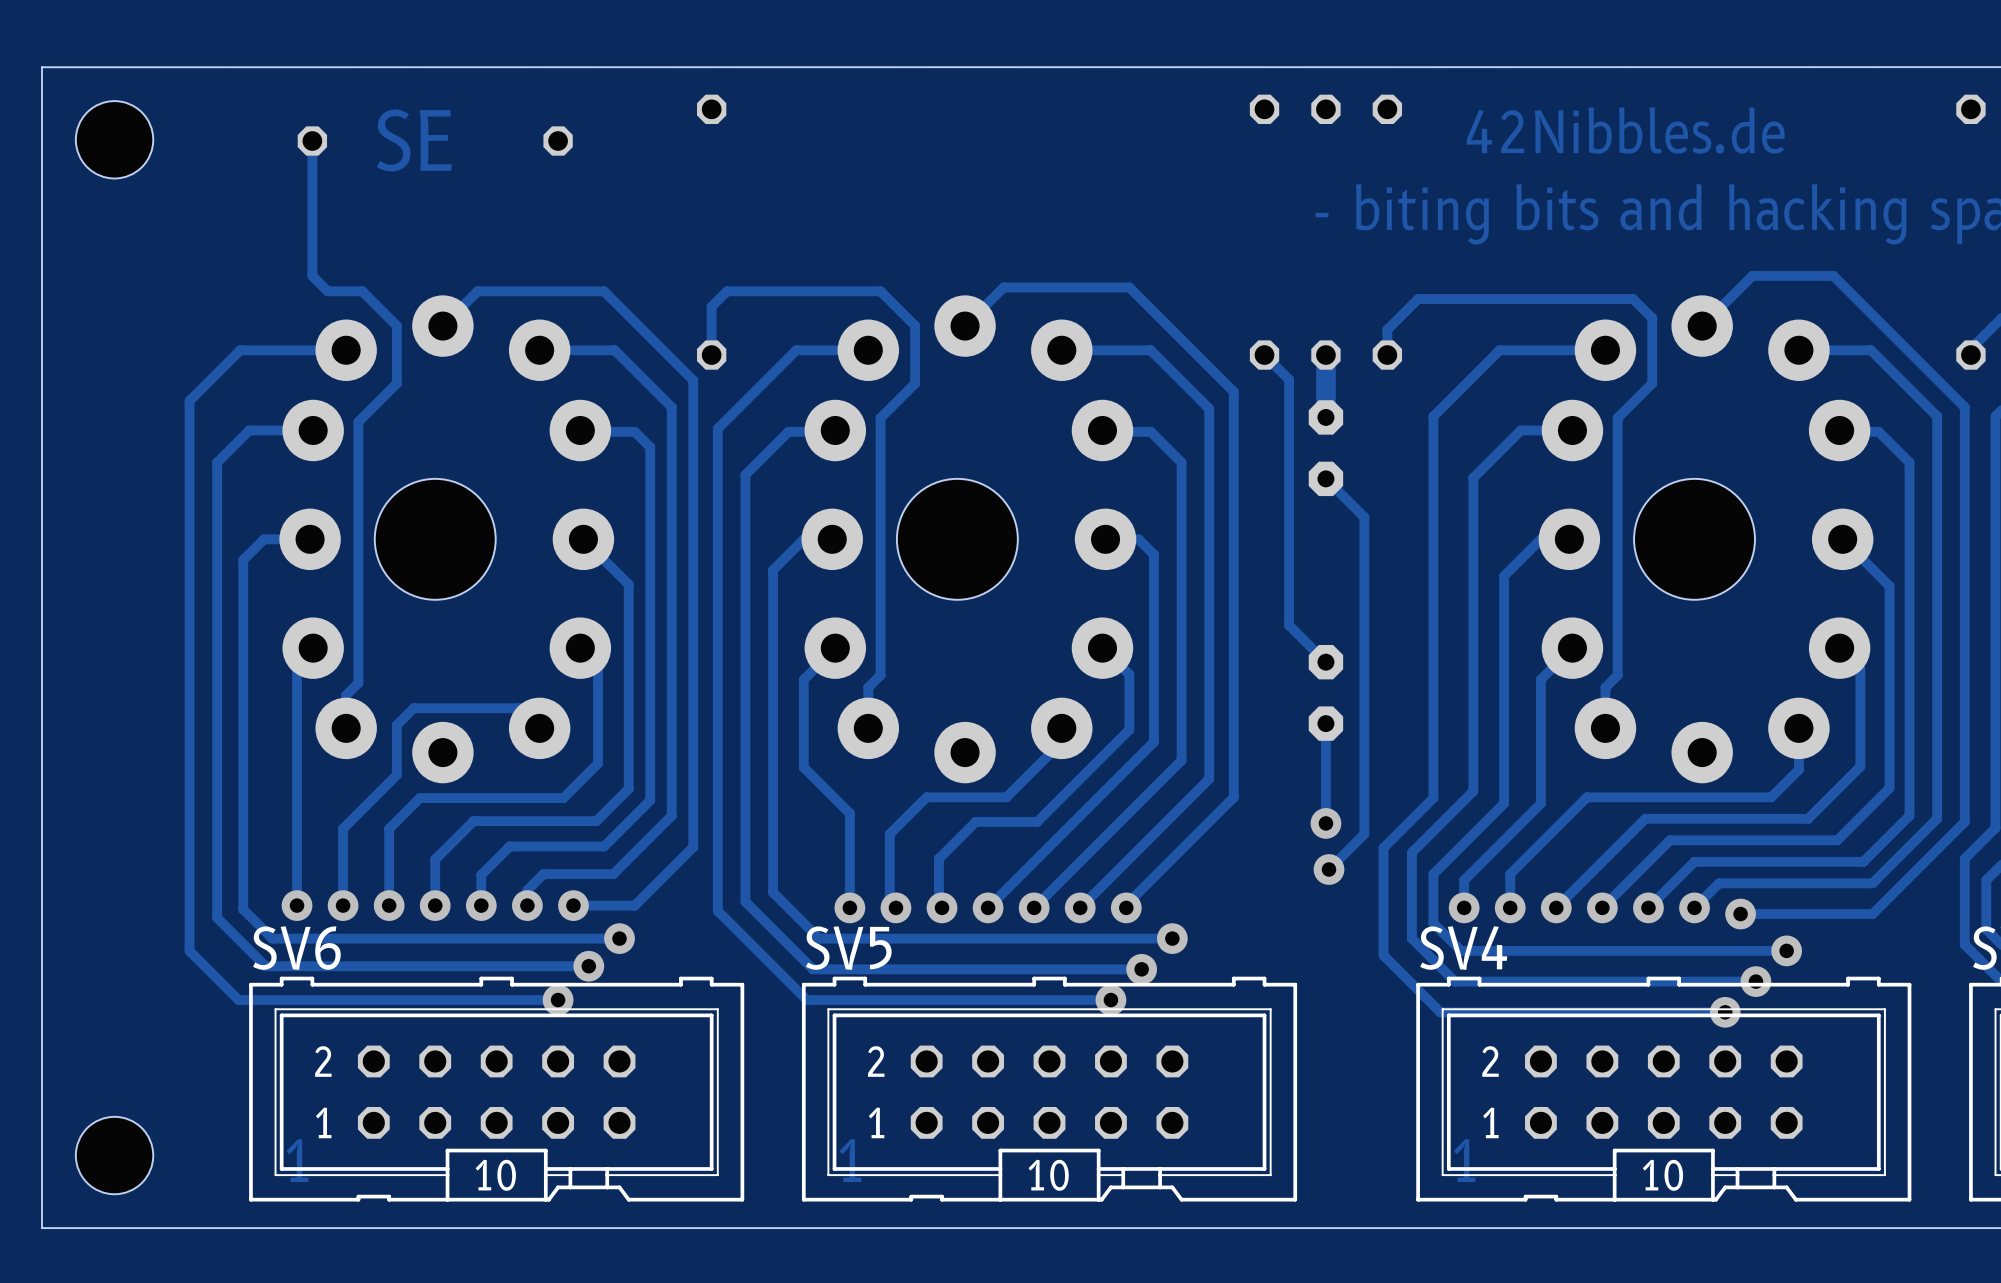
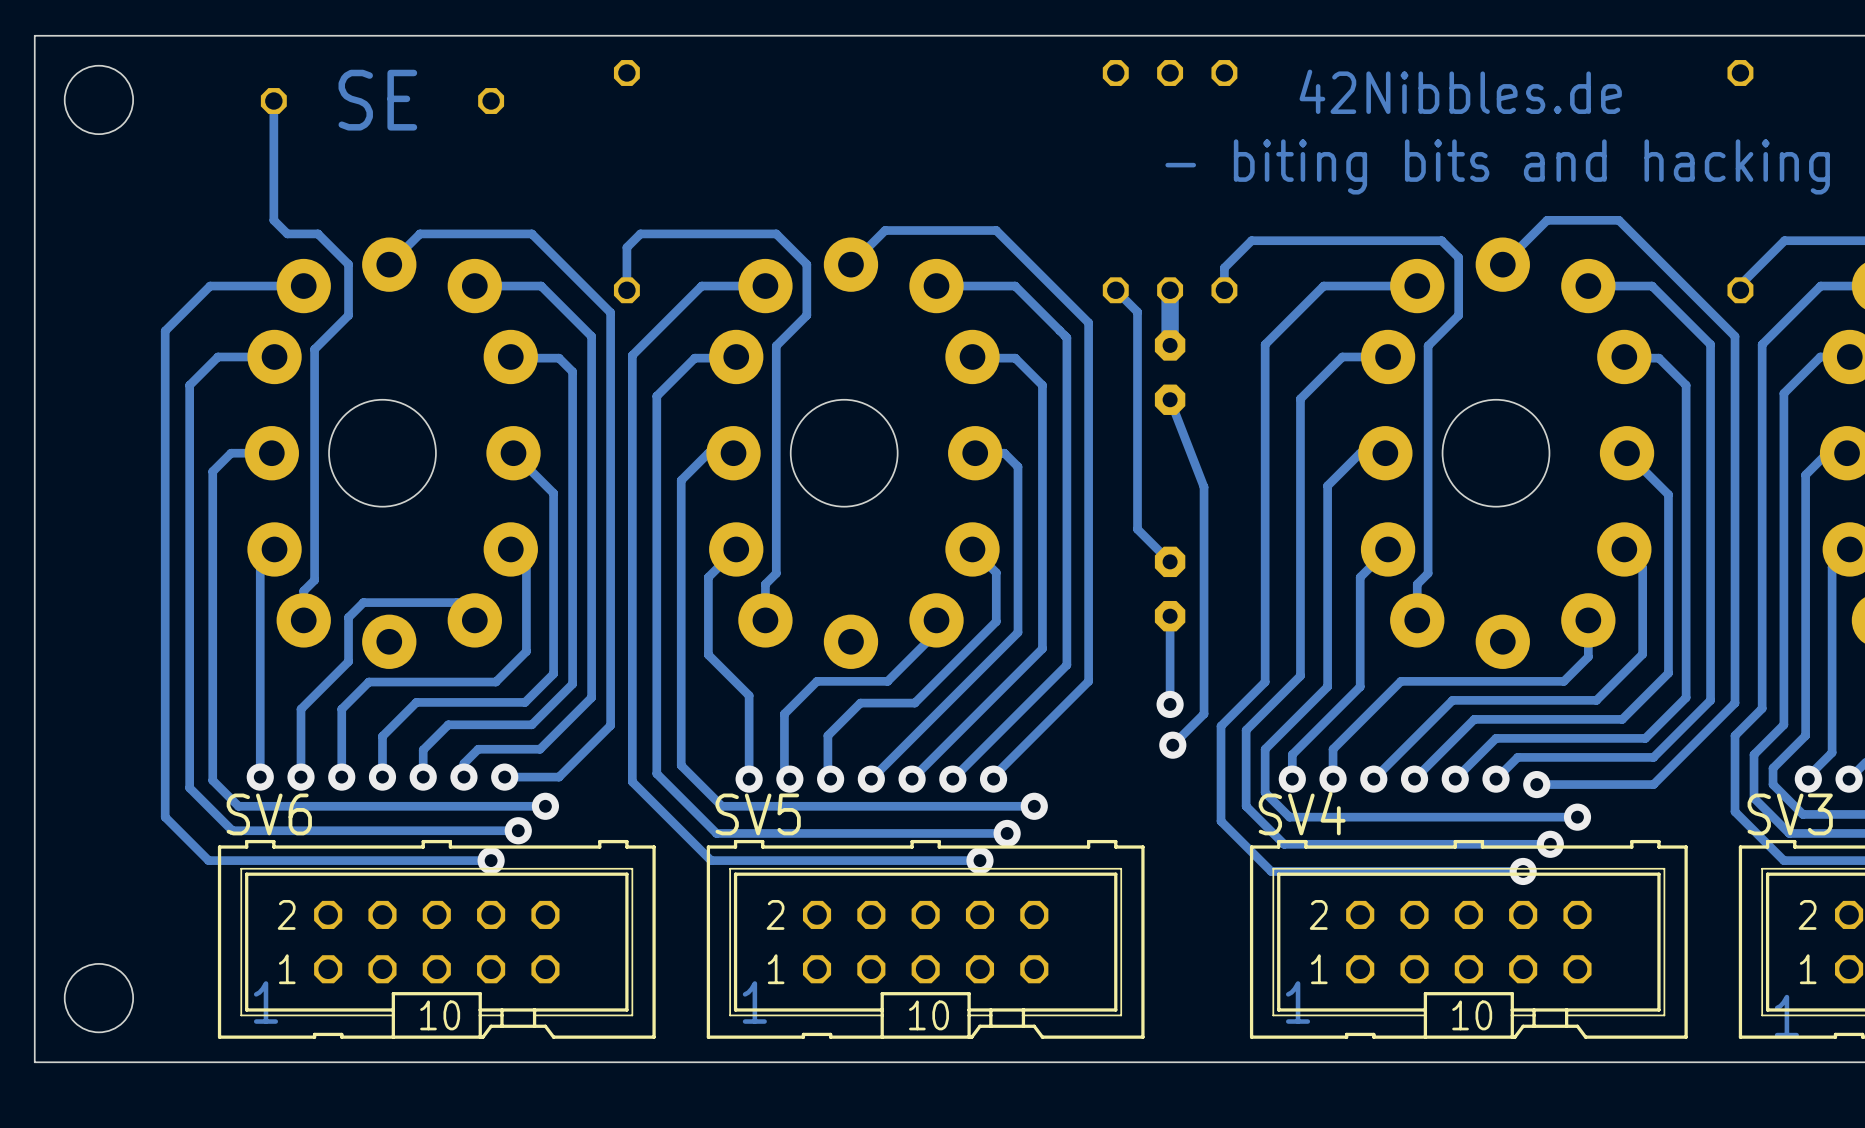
track: (1325, 478) (1364, 517) (1364, 577) -> (1170, 399) (1204, 487)

